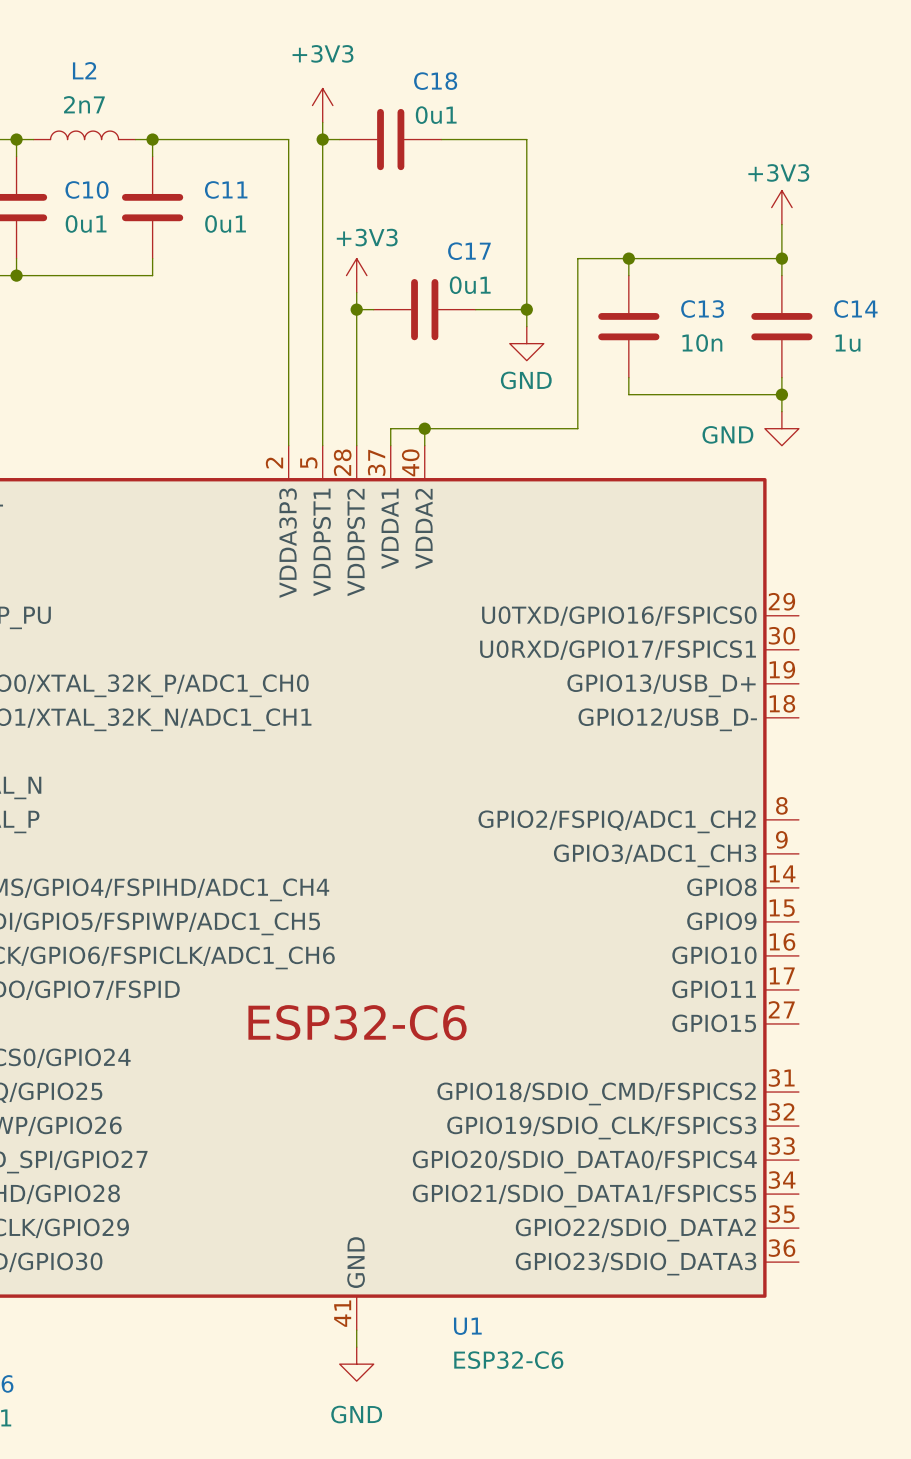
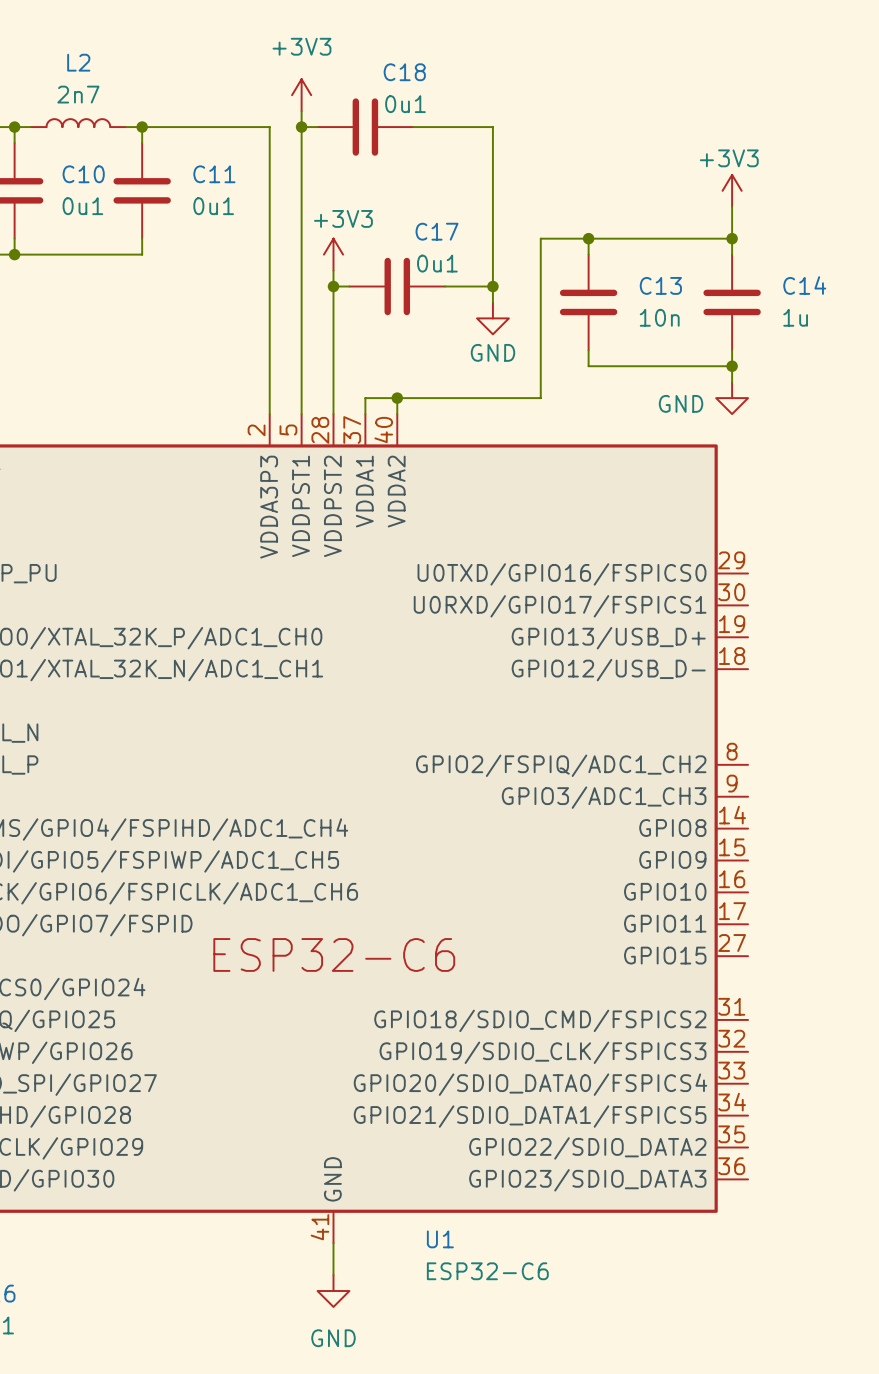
power symbol position: GND (356, 1364) -> GND (333, 1291)

